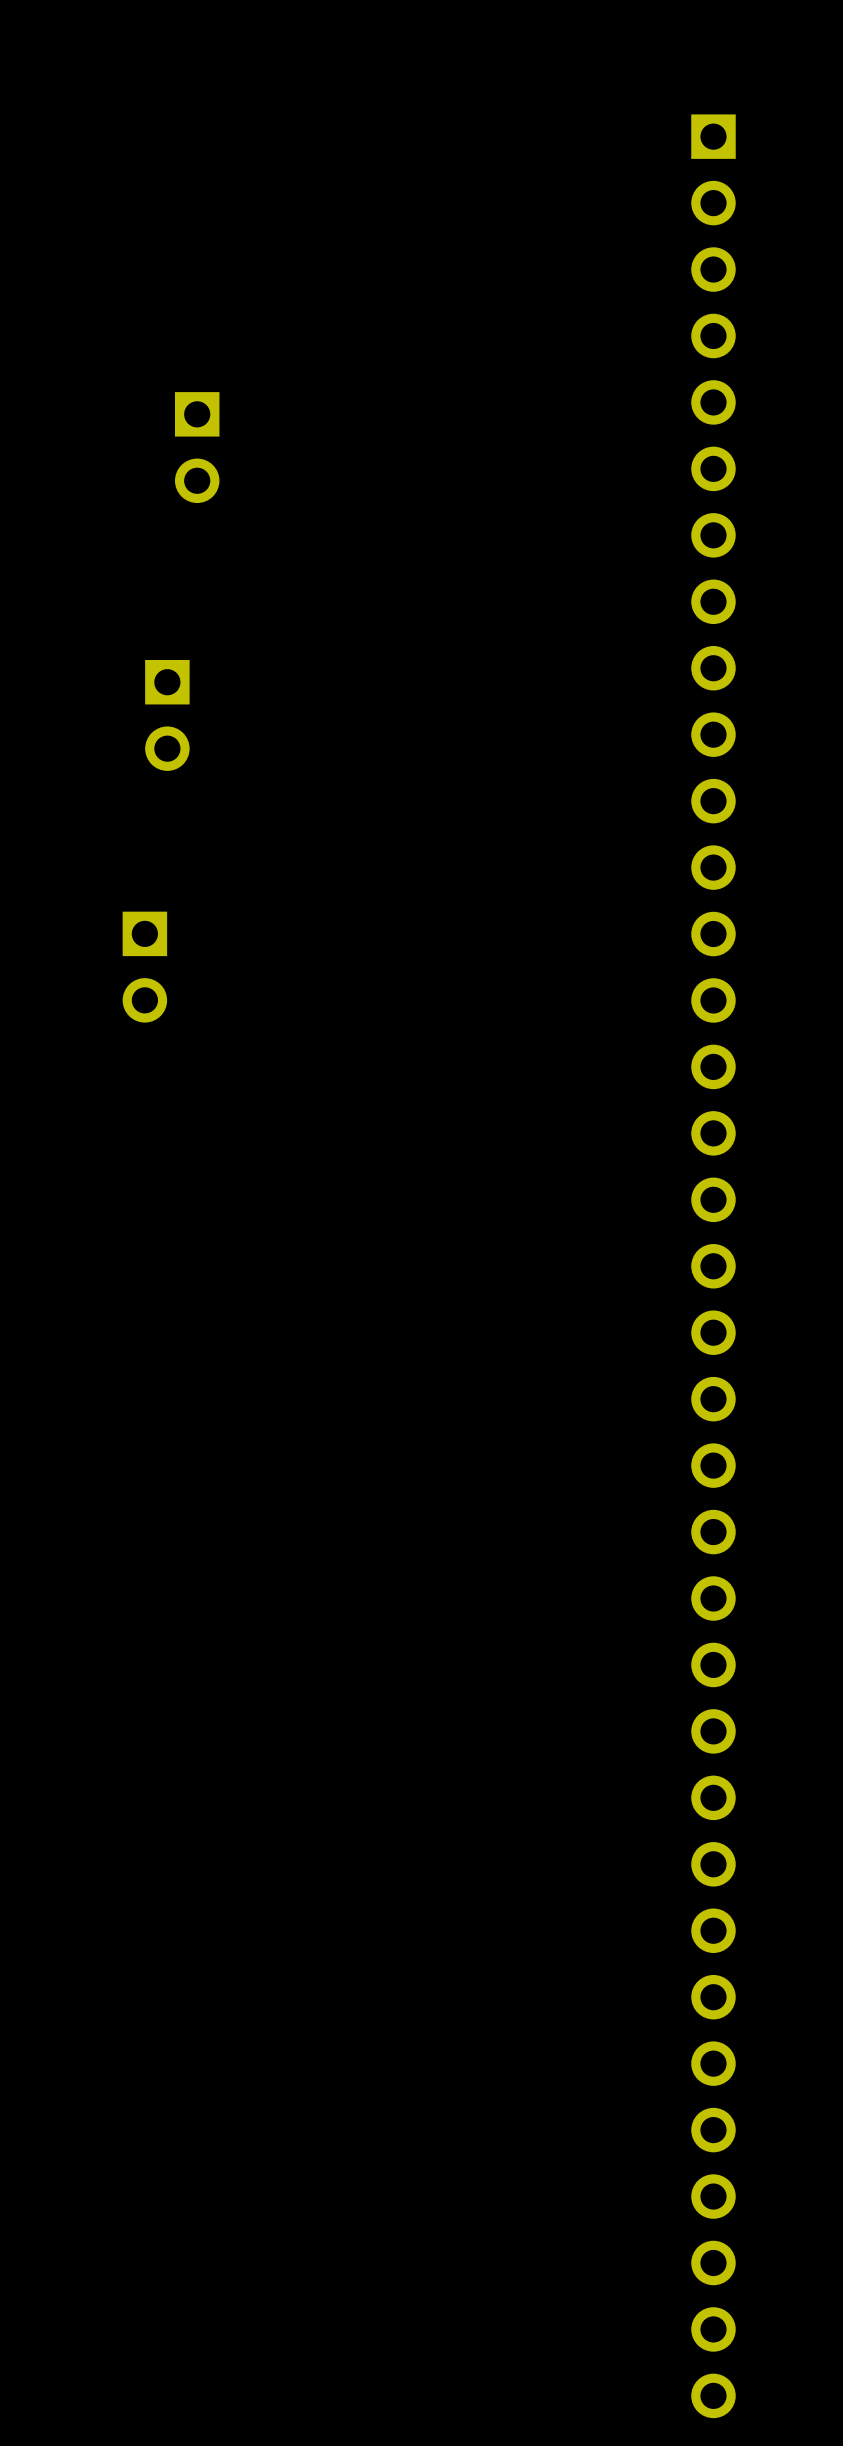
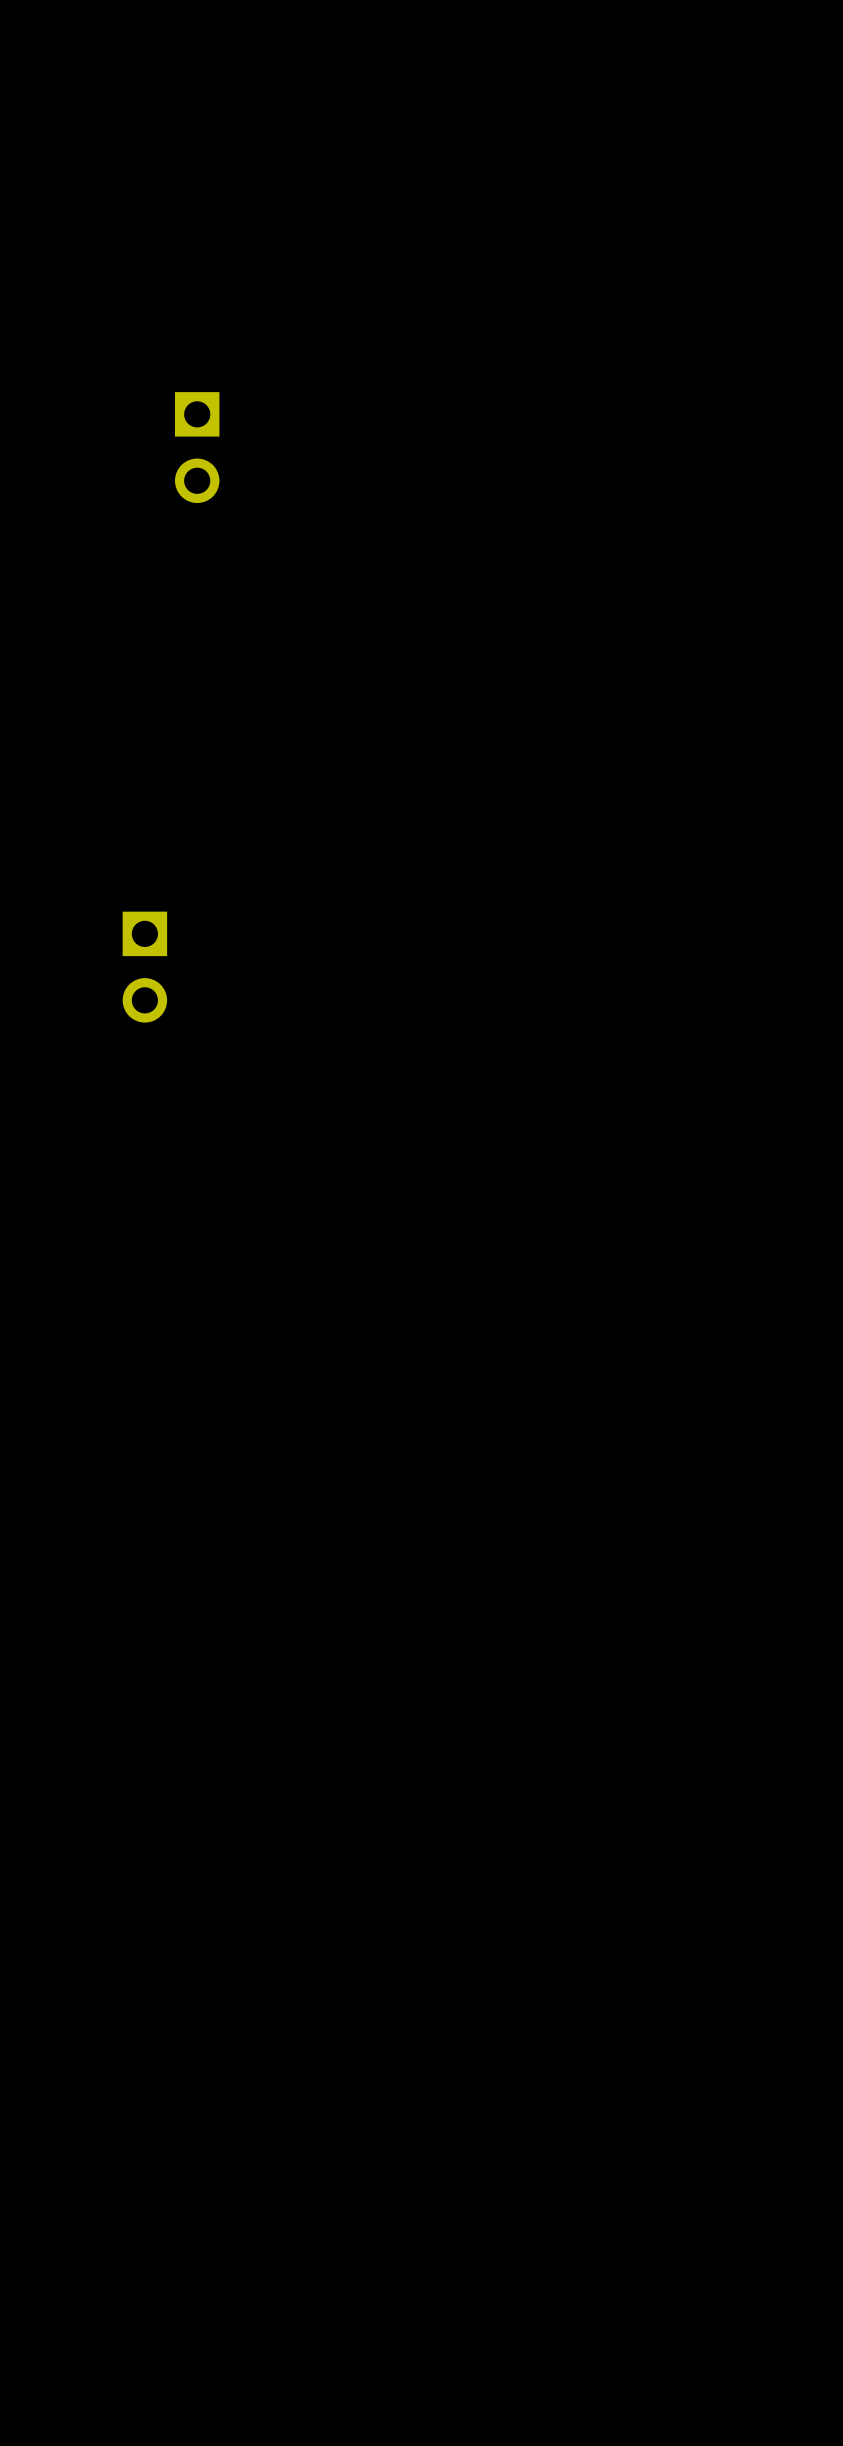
part: (167, 715) -> none
part: (713, 1266) -> none

